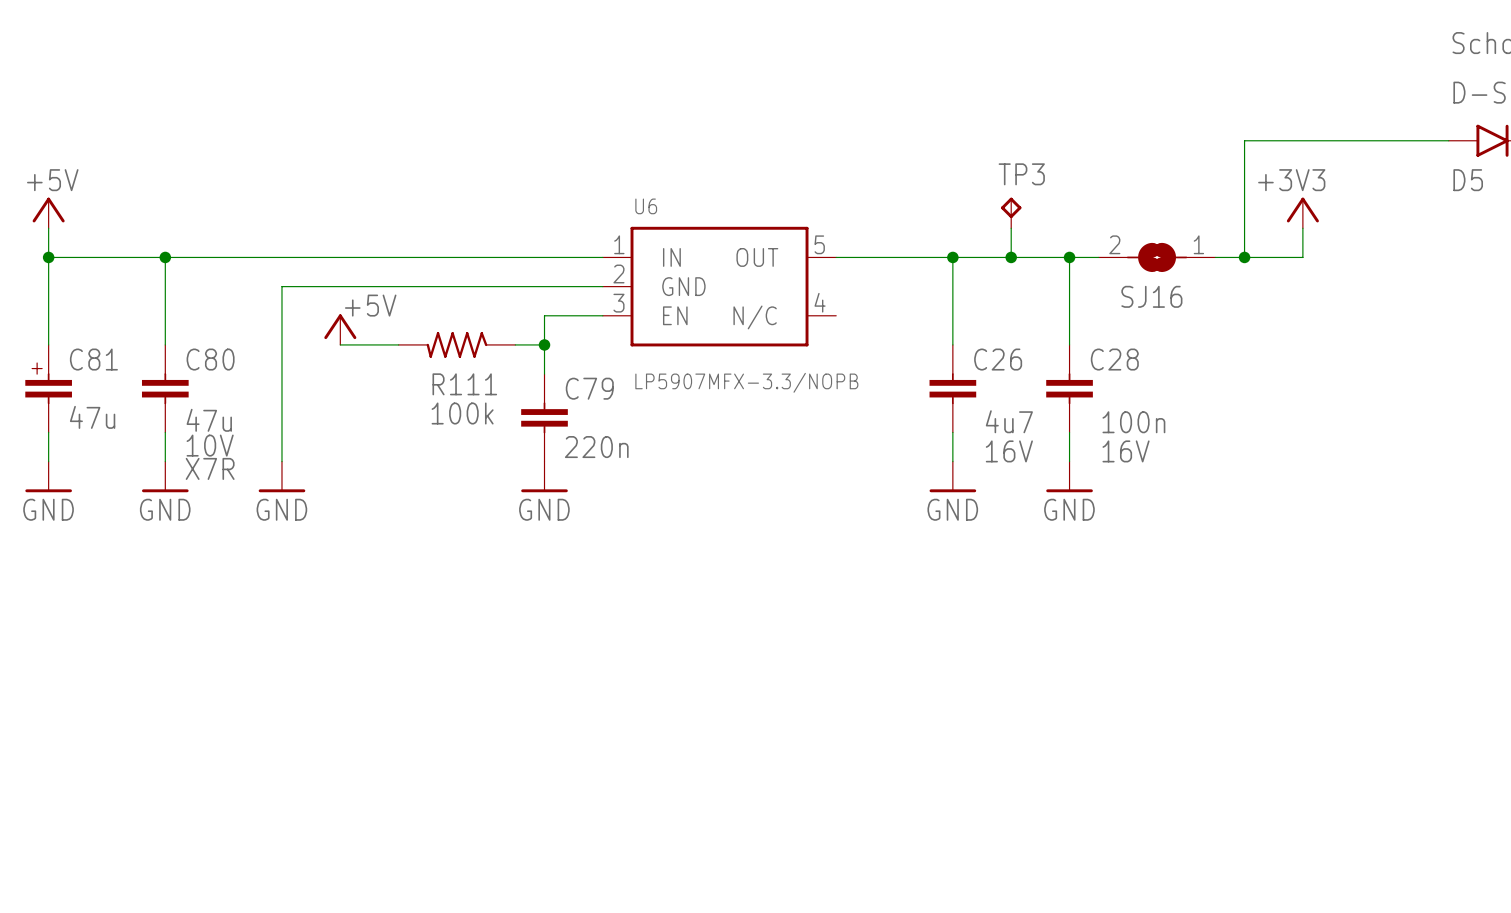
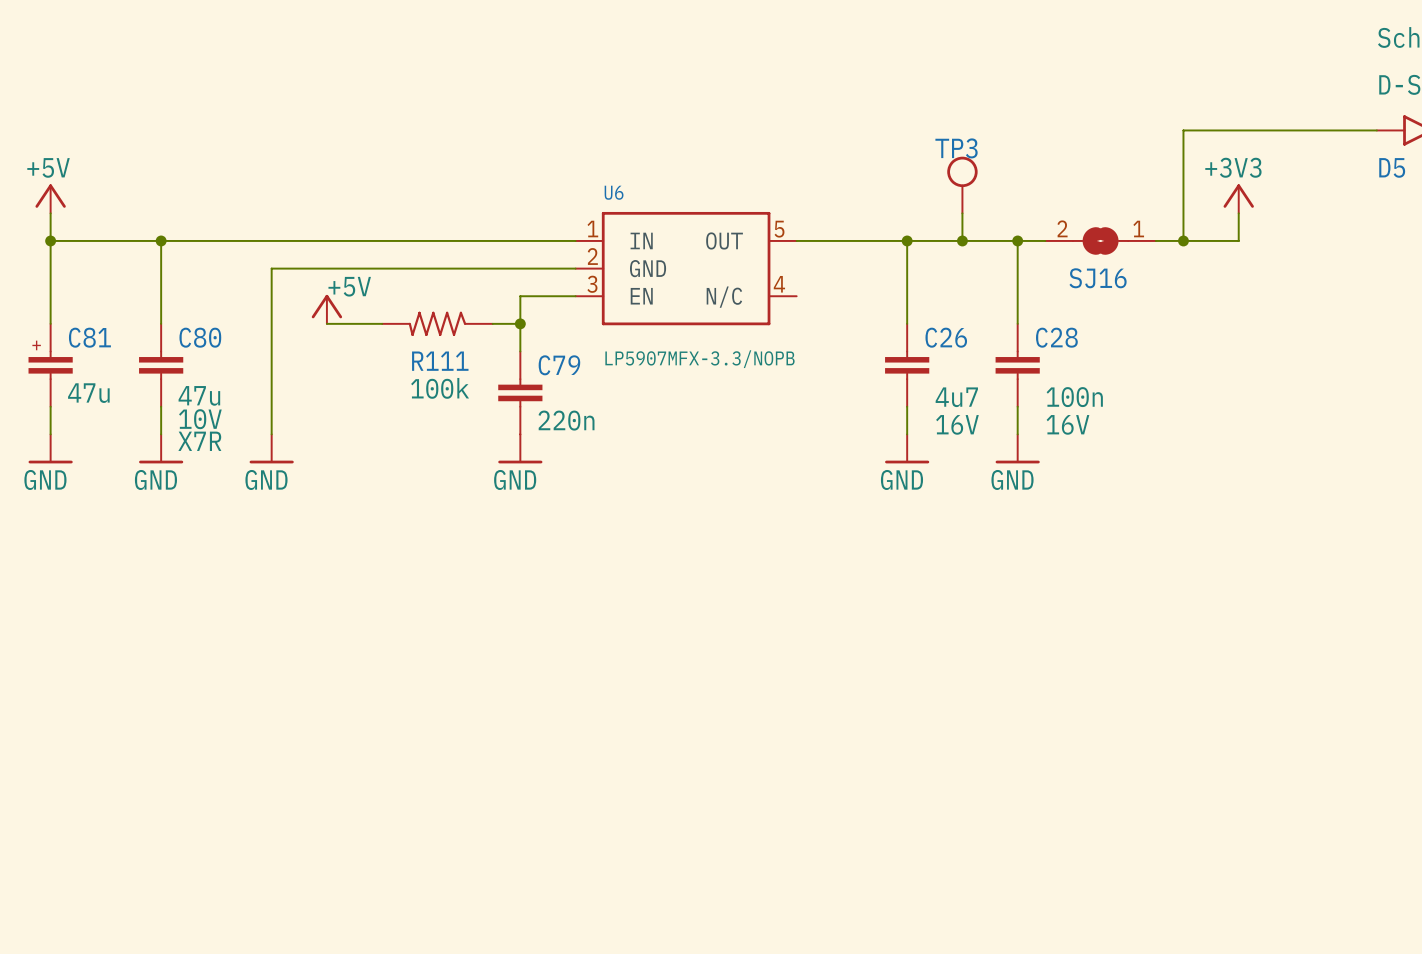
TP3 symbol: [1001, 197, 1022, 229] -> [947, 156, 978, 214]

